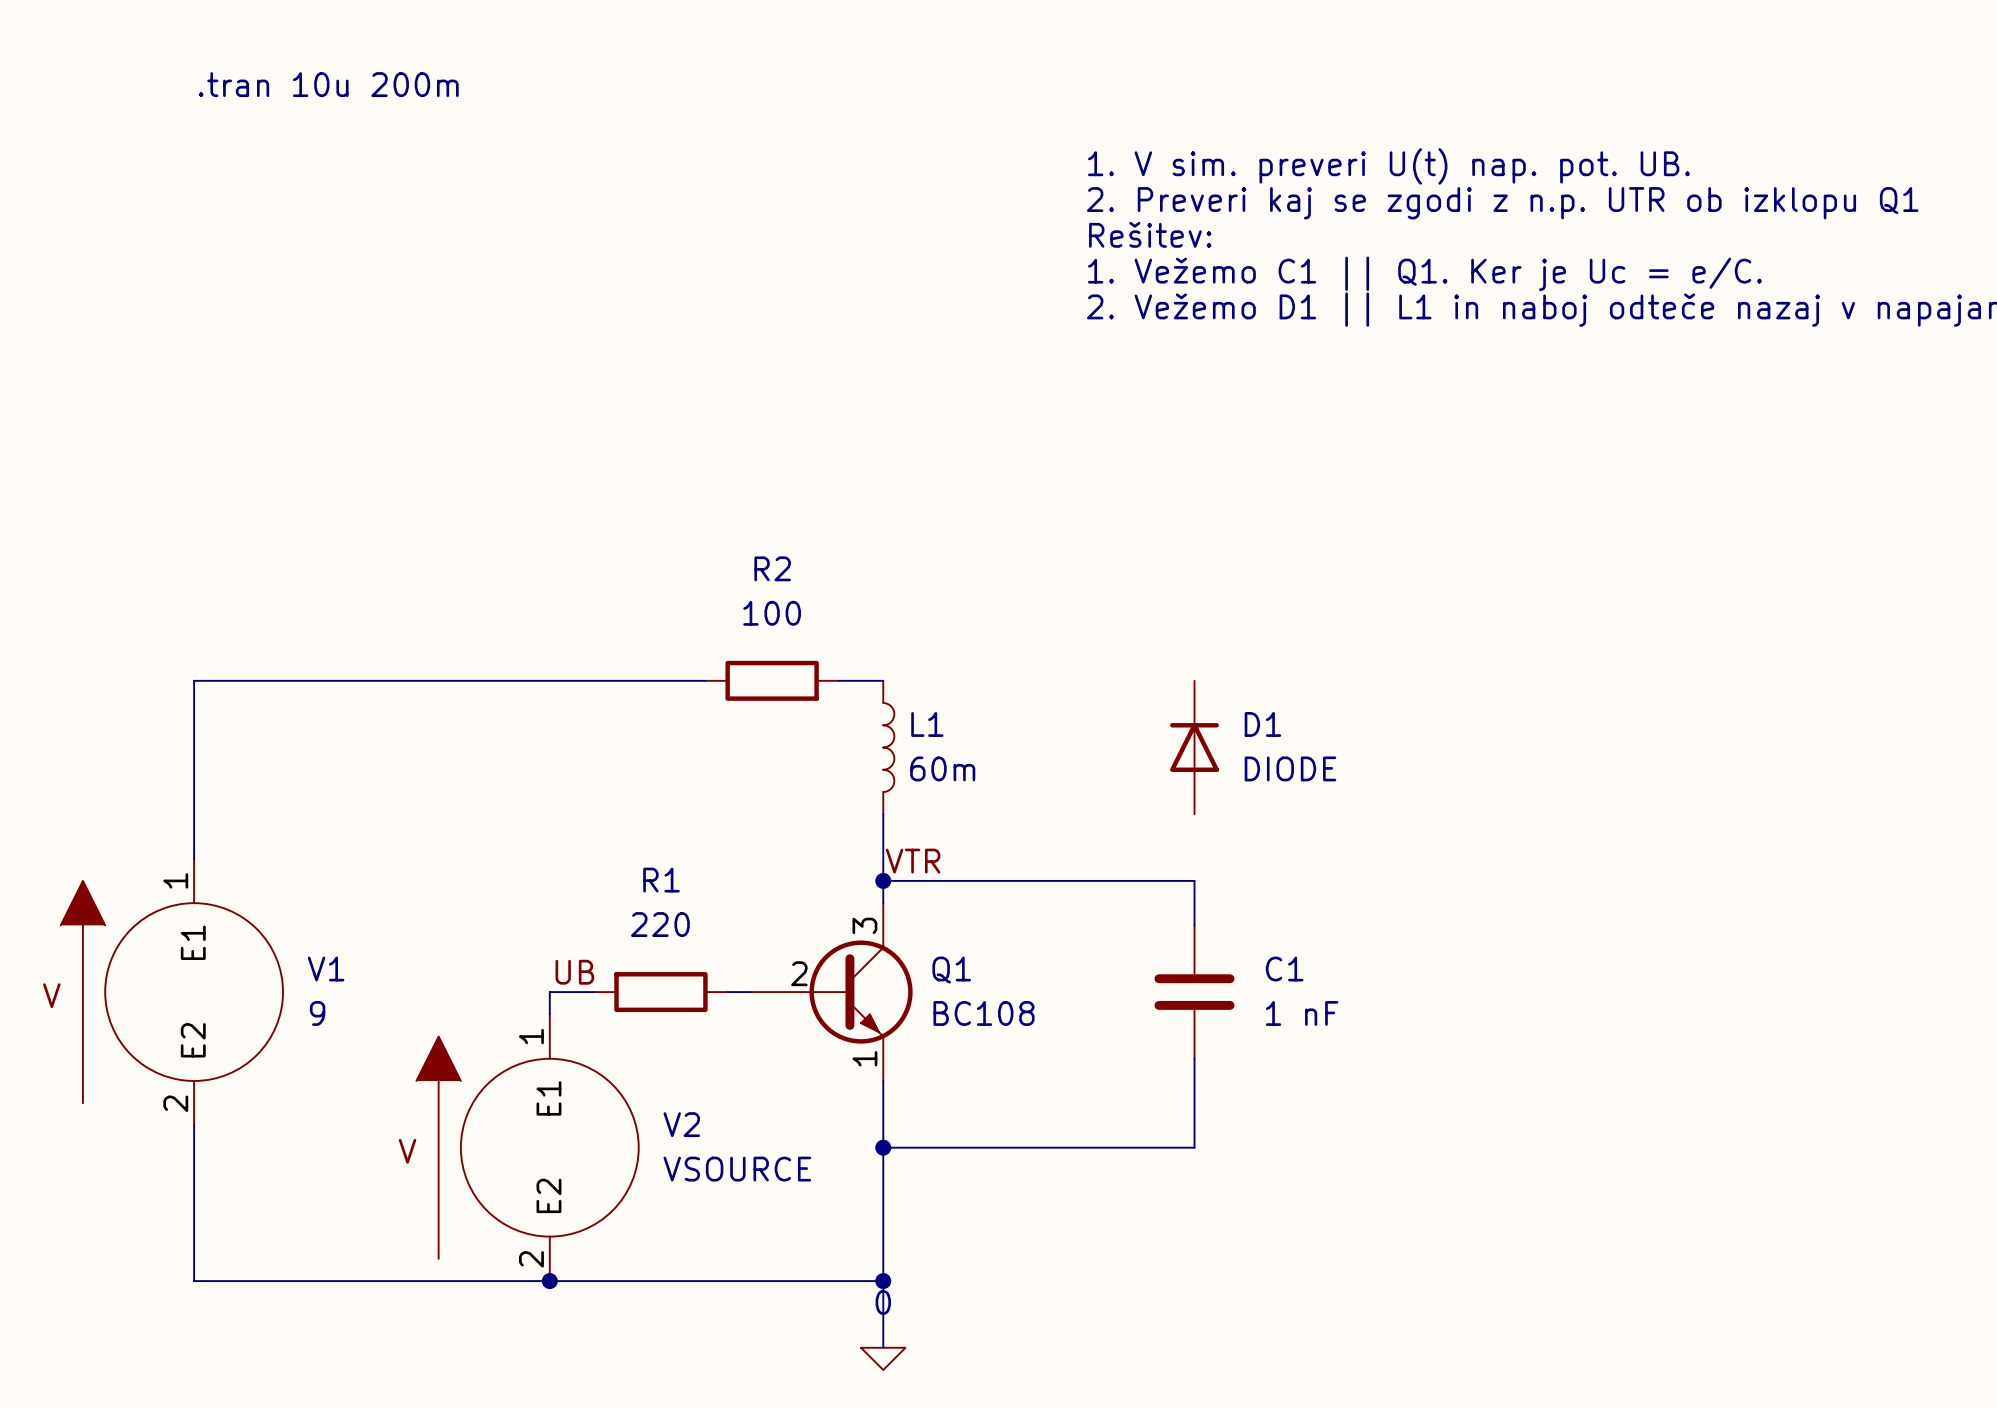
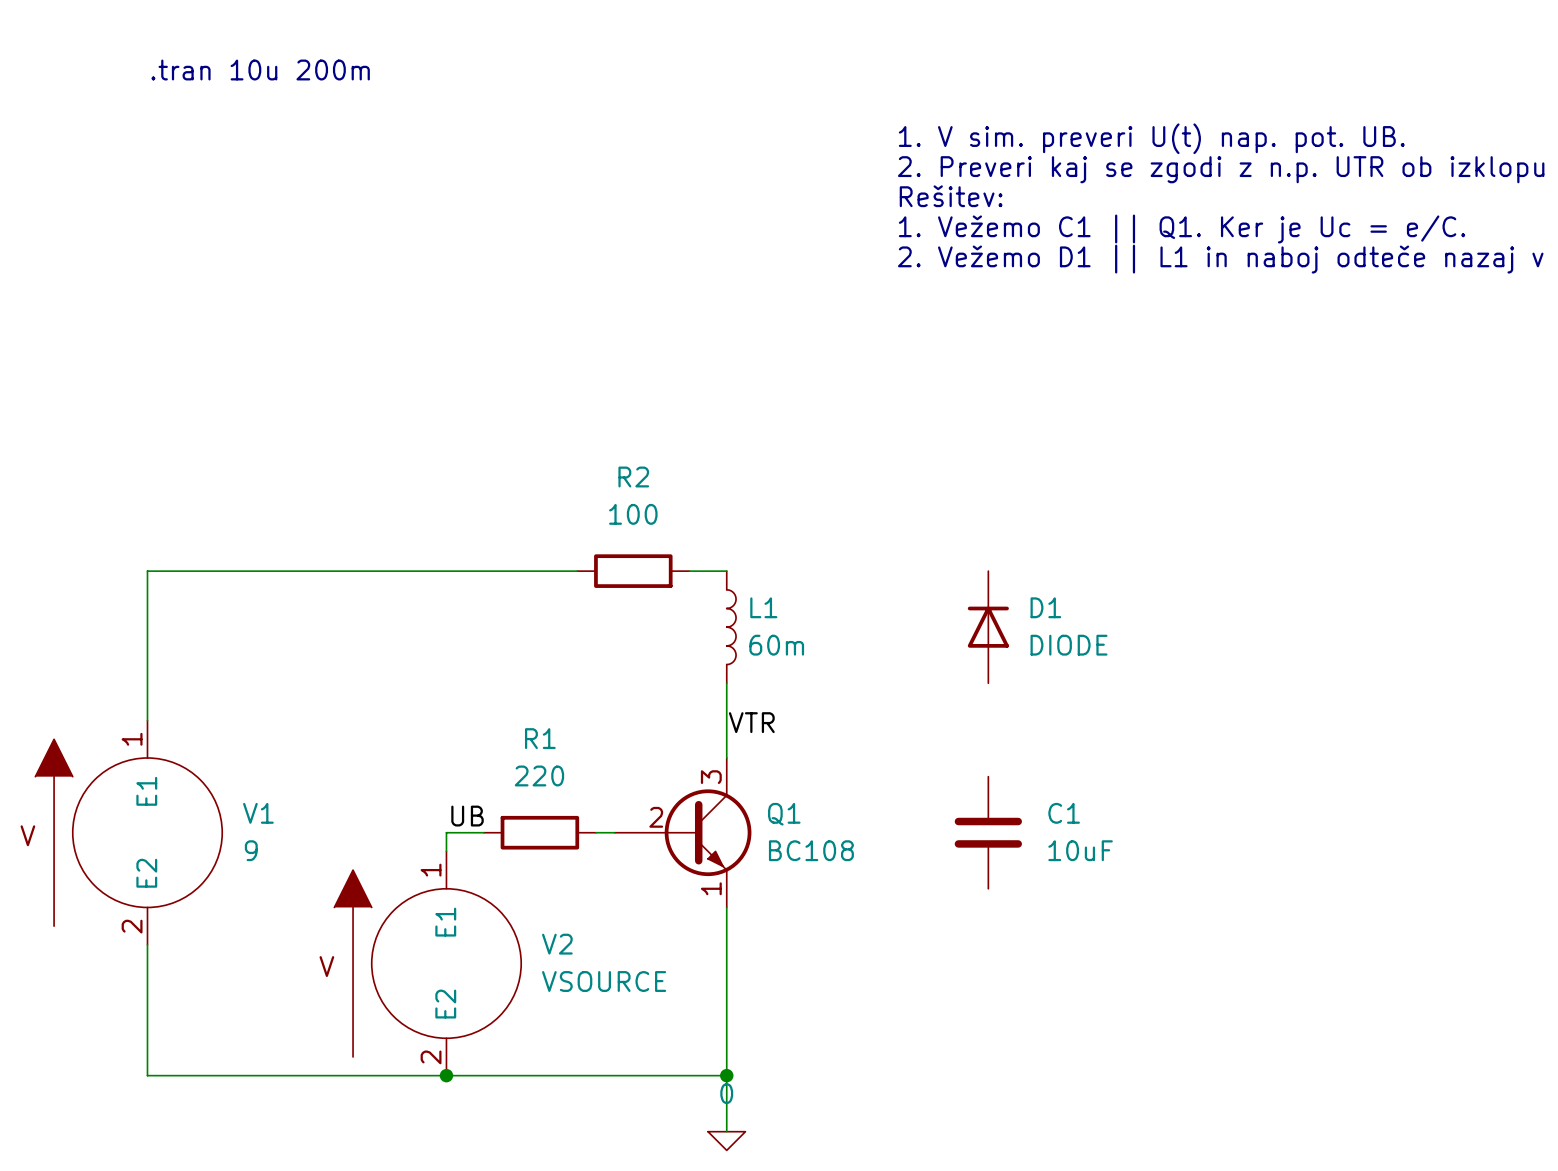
wire: (883, 880) (1194, 880) (1194, 925) -> none
junction: (883, 880) -> none
C1 value: 1 nF (1302, 1013) -> 10uF (1080, 850)
wire: (1194, 1058) (1194, 1147) (883, 1147) -> none
junction: (883, 1147) -> none

